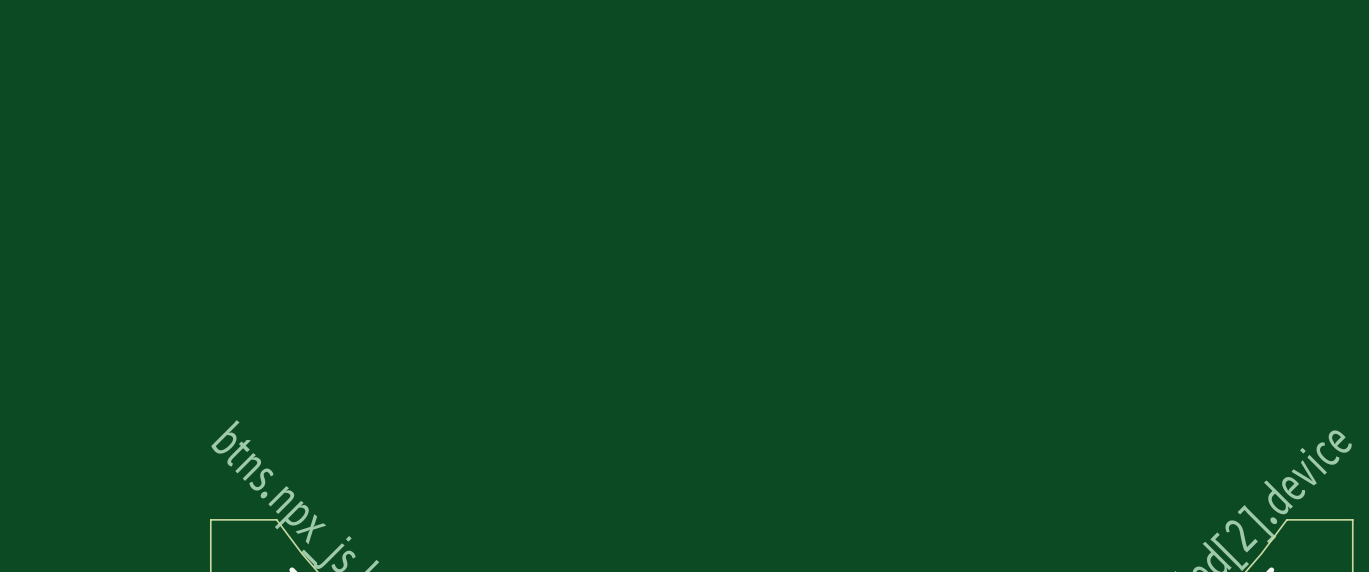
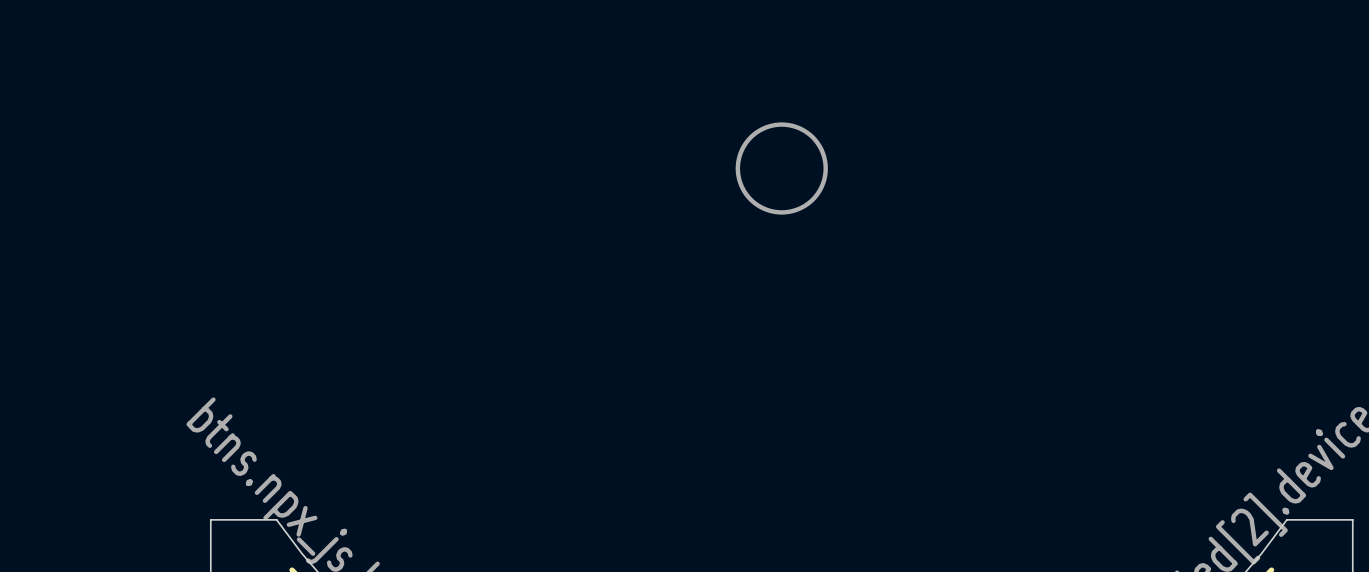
drawing: none -> [735, 122, 828, 215]

